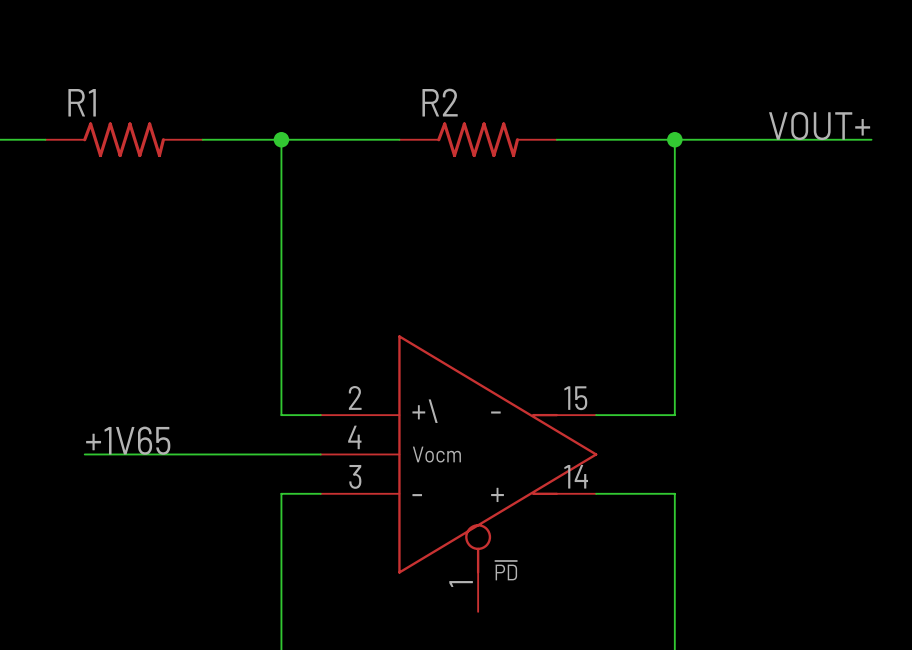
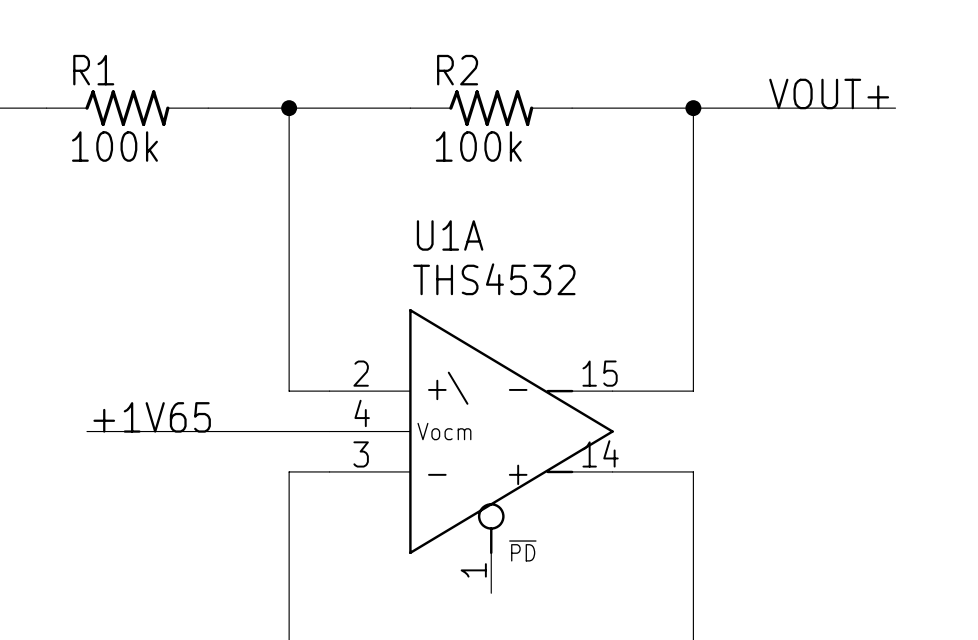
R1 value: none -> 100k (114, 146)
R2 value: none -> 100k (478, 146)
U1A name: none -> U1A (450, 235)
U1A value: none -> THS4532 (494, 279)

